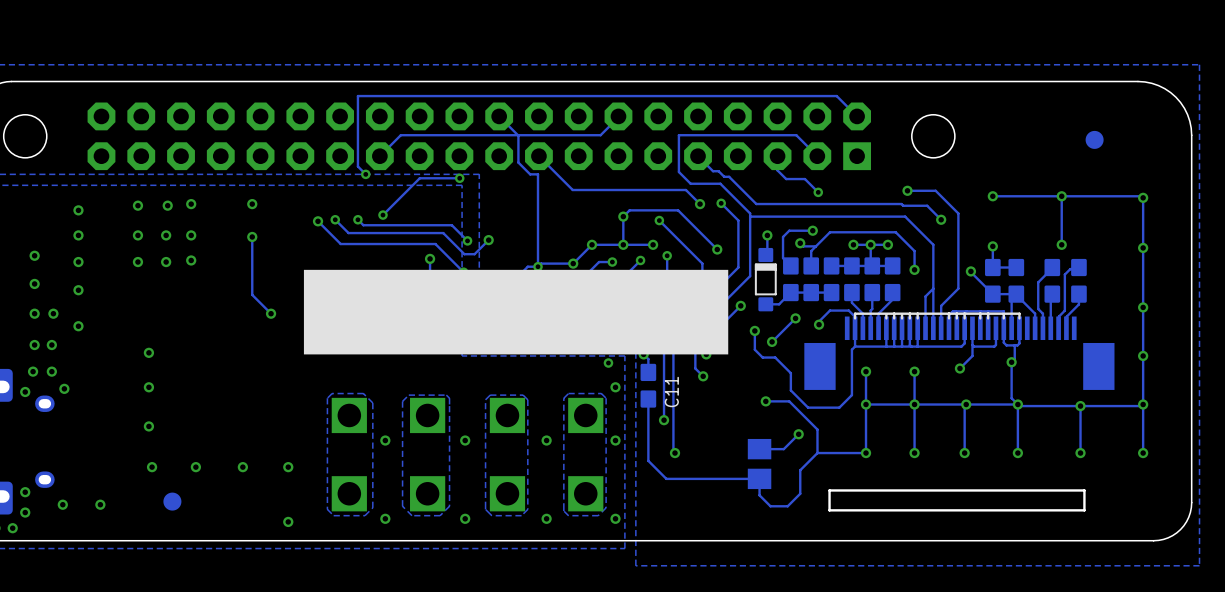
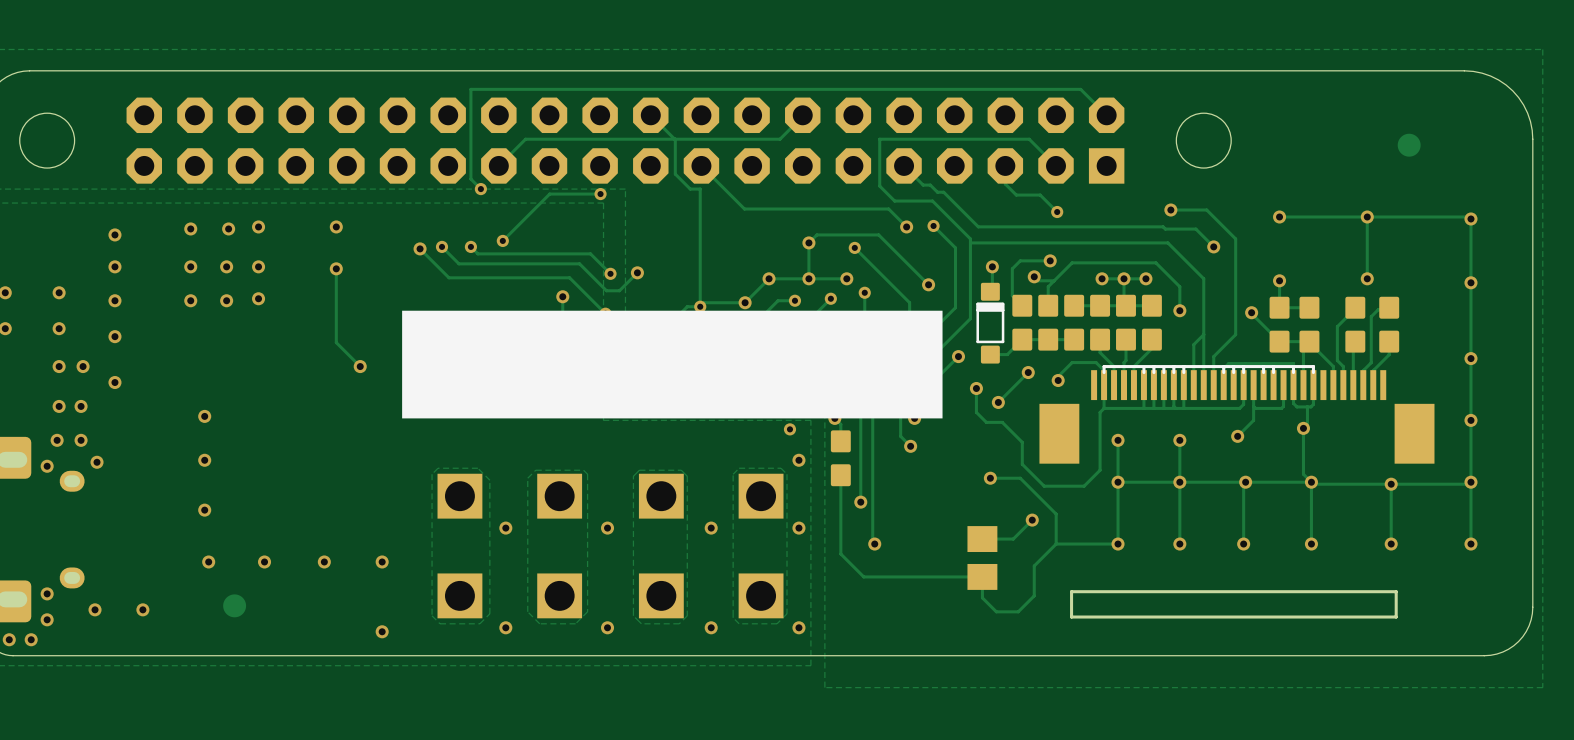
C11 name: C11 (671, 391) -> none

